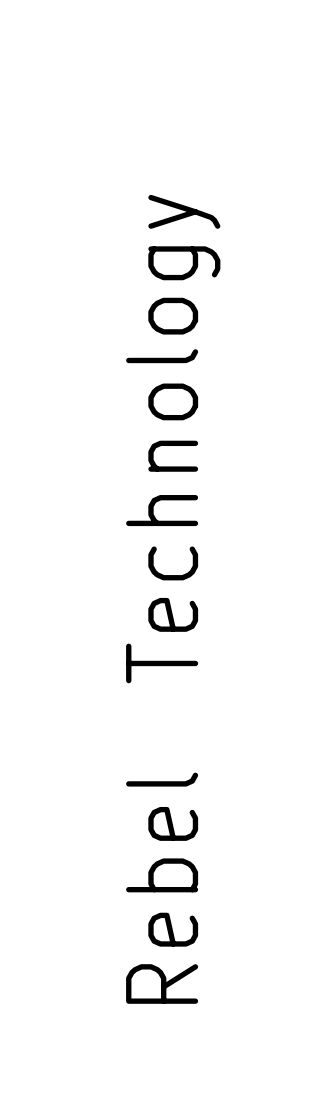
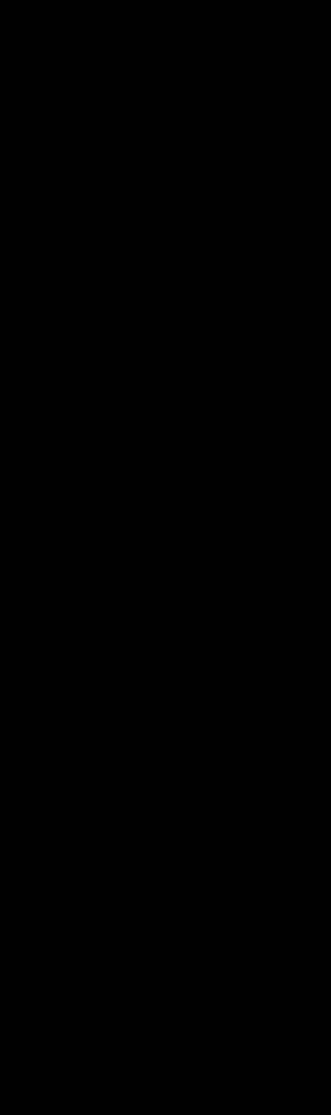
text: Technology (173, 439) -> none
text: Rebel (162, 888) -> none

